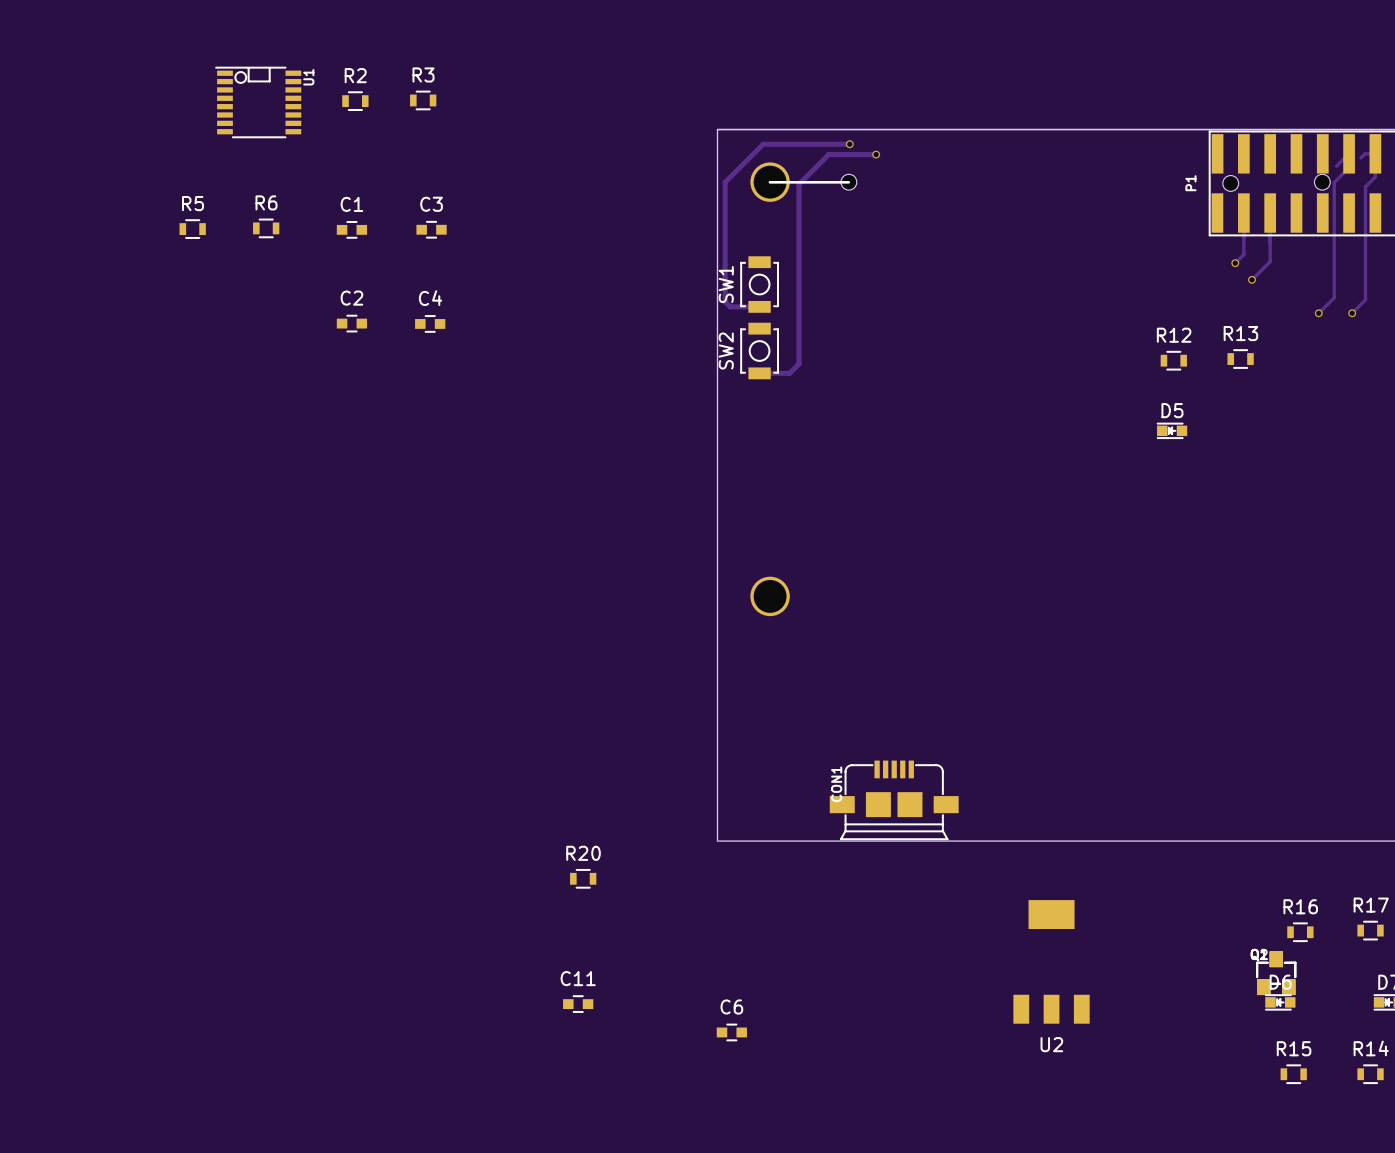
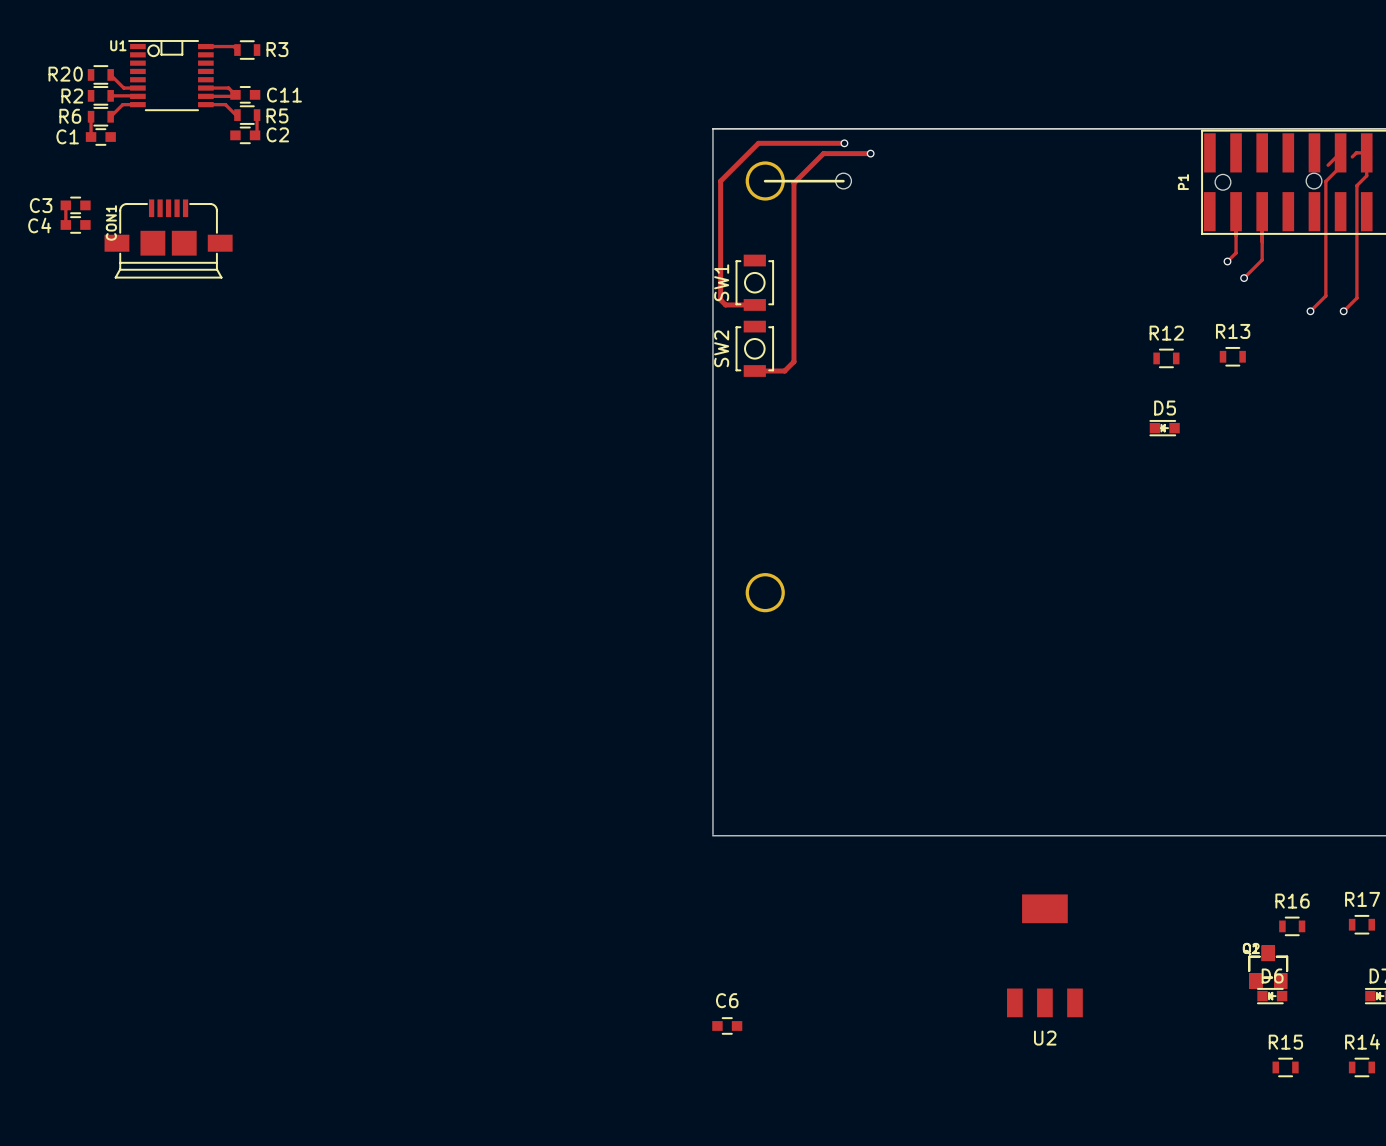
track: none -> (205, 46) (233, 46) (237, 50)
R3 name position: R3 (423, 74) -> R3 (277, 49)
track: none -> (110, 74) (123, 88) (137, 88)
R2 name position: R2 (355, 75) -> R2 (72, 96)
U1 name rotation: 0° (308, 77) -> 90° clockwise (118, 45)
U1 name position: U1 (308, 77) -> U1 (118, 45)
track: none -> (205, 88) (228, 88) (235, 94) (205, 96)
track: none -> (110, 95) (137, 96)
R3 position: (423, 100) -> (247, 50)
R2 position: (355, 101) -> (100, 95)
U1 position: (258, 102) -> (170, 75)
track: none -> (137, 104) (122, 104) (110, 116)
track: none -> (205, 104) (225, 104) (237, 115)
track: none -> (257, 115) (257, 133) (255, 135)
track: none -> (91, 116) (91, 137)
R6 name position: R6 (266, 202) -> R6 (70, 116)
R5 name position: R5 (193, 203) -> R5 (277, 115)
C1 name position: C1 (351, 204) -> C1 (67, 136)
C3 name position: C3 (431, 204) -> C3 (41, 205)
track: none -> (65, 205) (65, 224)
R6 position: (266, 228) -> (100, 116)
R5 position: (192, 229) -> (247, 115)
C1 position: (351, 229) -> (100, 137)
C3 position: (431, 229) -> (75, 205)
C2 name position: C2 (351, 298) -> C2 (277, 134)
C4 name position: C4 (430, 298) -> C4 (39, 225)
C2 position: (351, 323) -> (245, 135)
C4 position: (430, 323) -> (75, 224)
CON1 position: (894, 800) -> (168, 239)
R20 name position: R20 (583, 853) -> R20 (65, 74)
R20 position: (583, 878) -> (100, 74)
C11 name position: C11 (578, 978) -> C11 (284, 95)
C11 position: (578, 1004) -> (245, 94)

